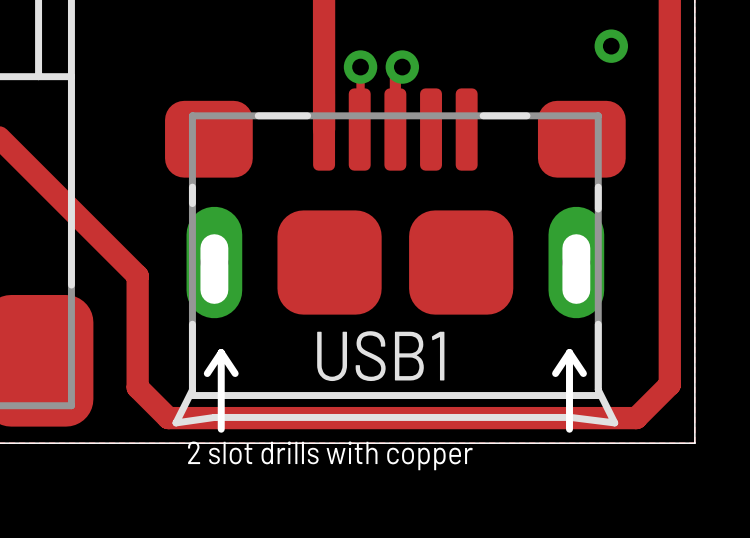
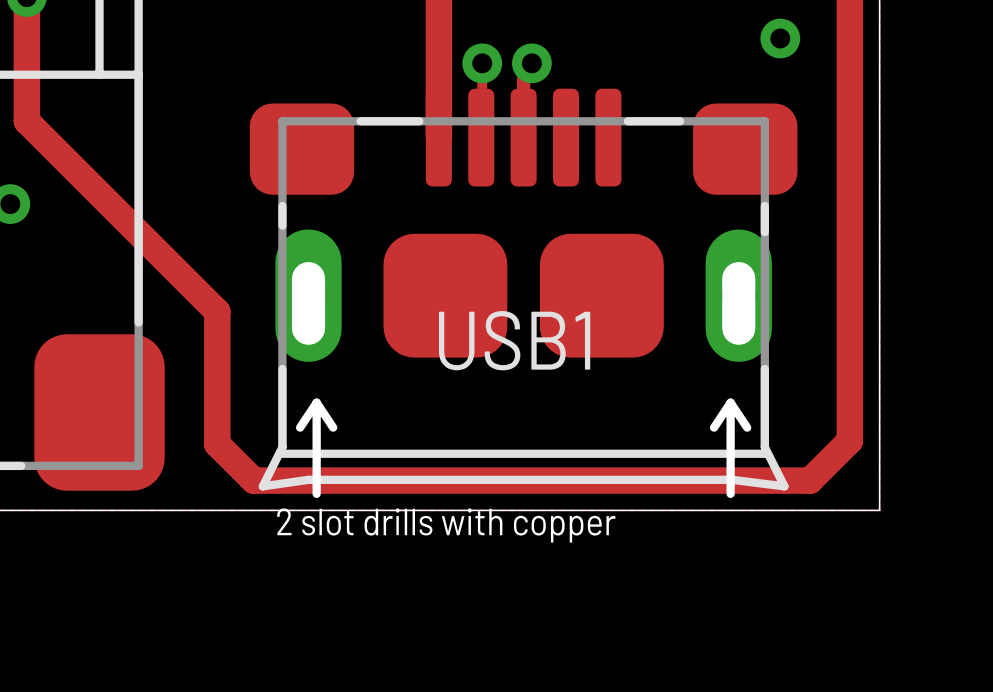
USB1 name position: USB1 (380, 356) -> USB1 (514, 340)

